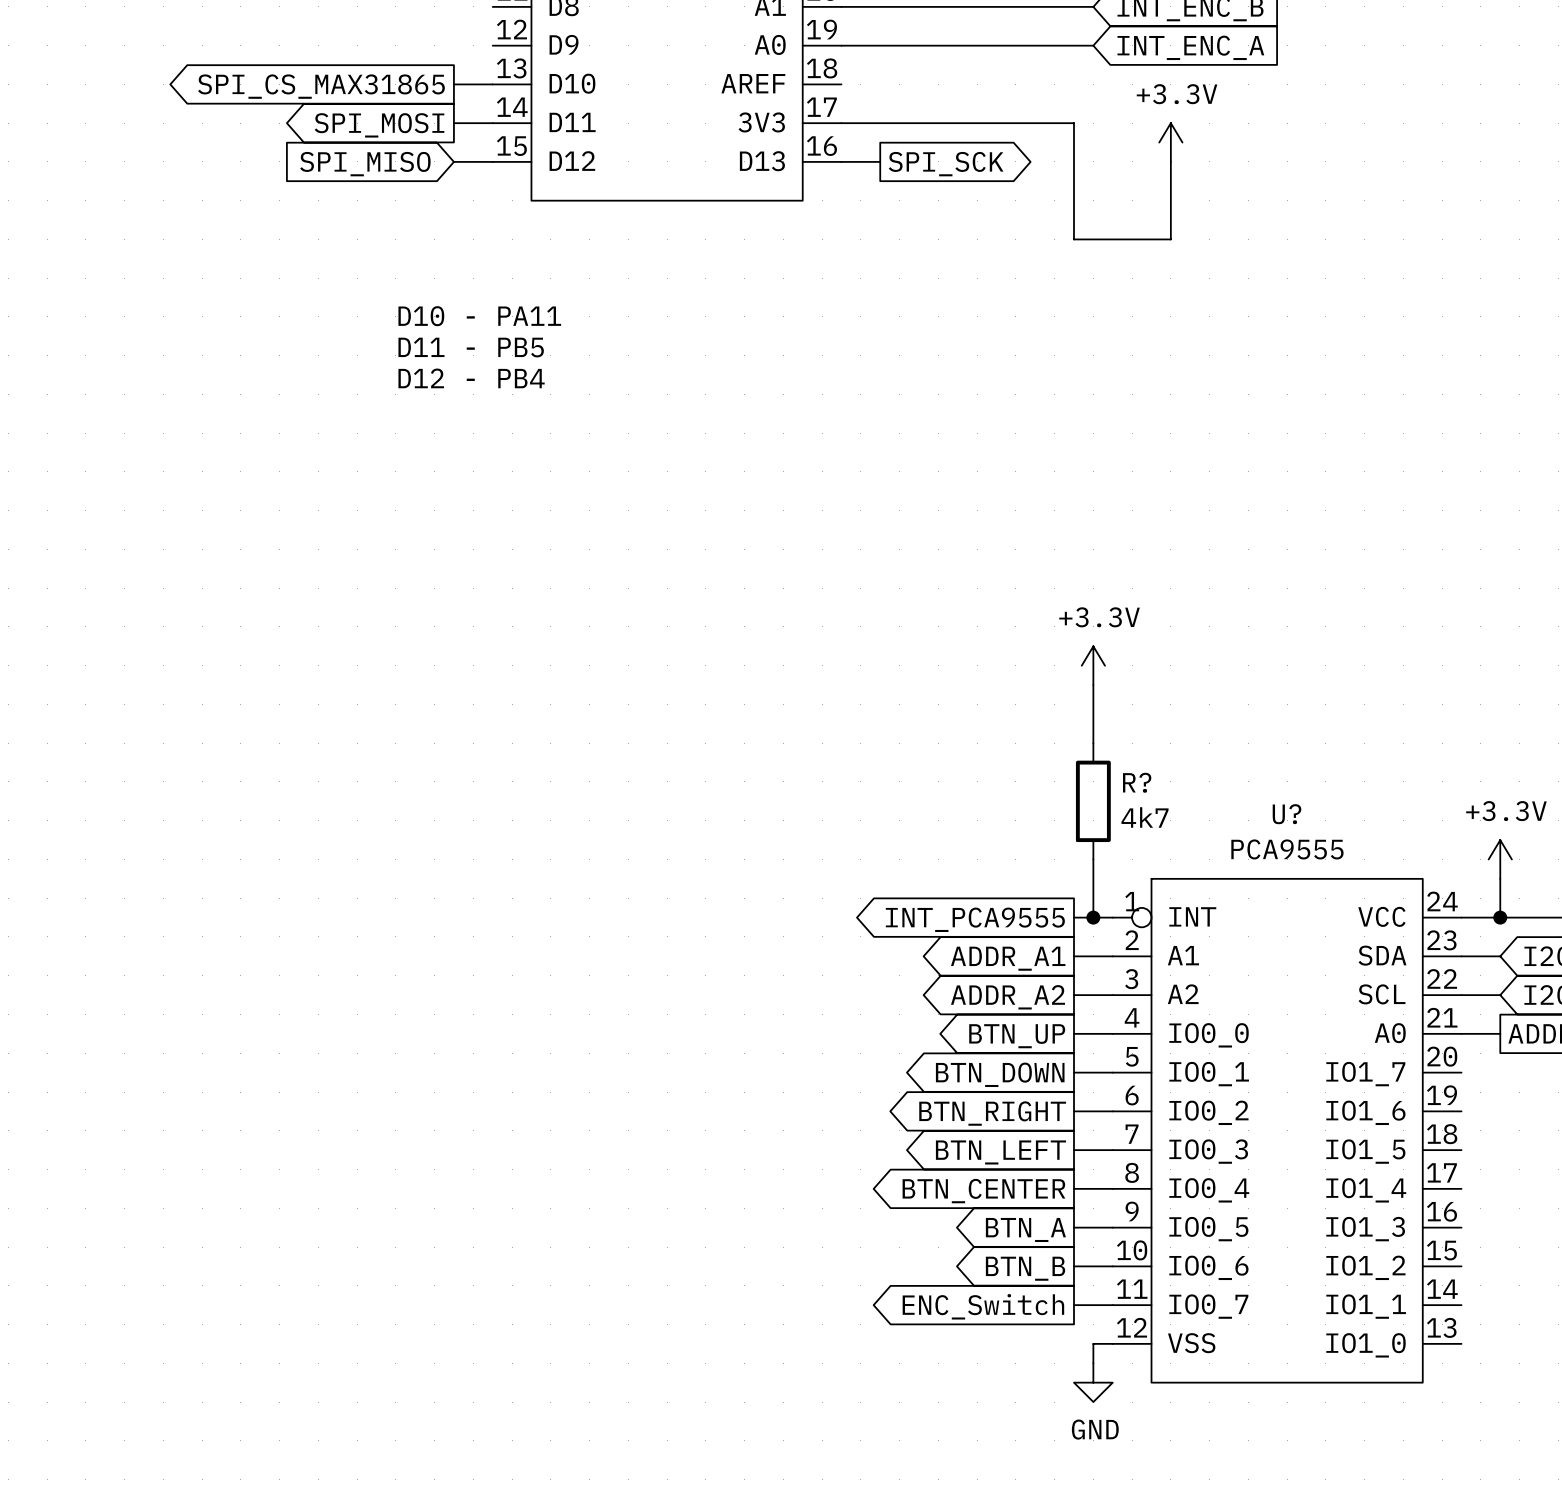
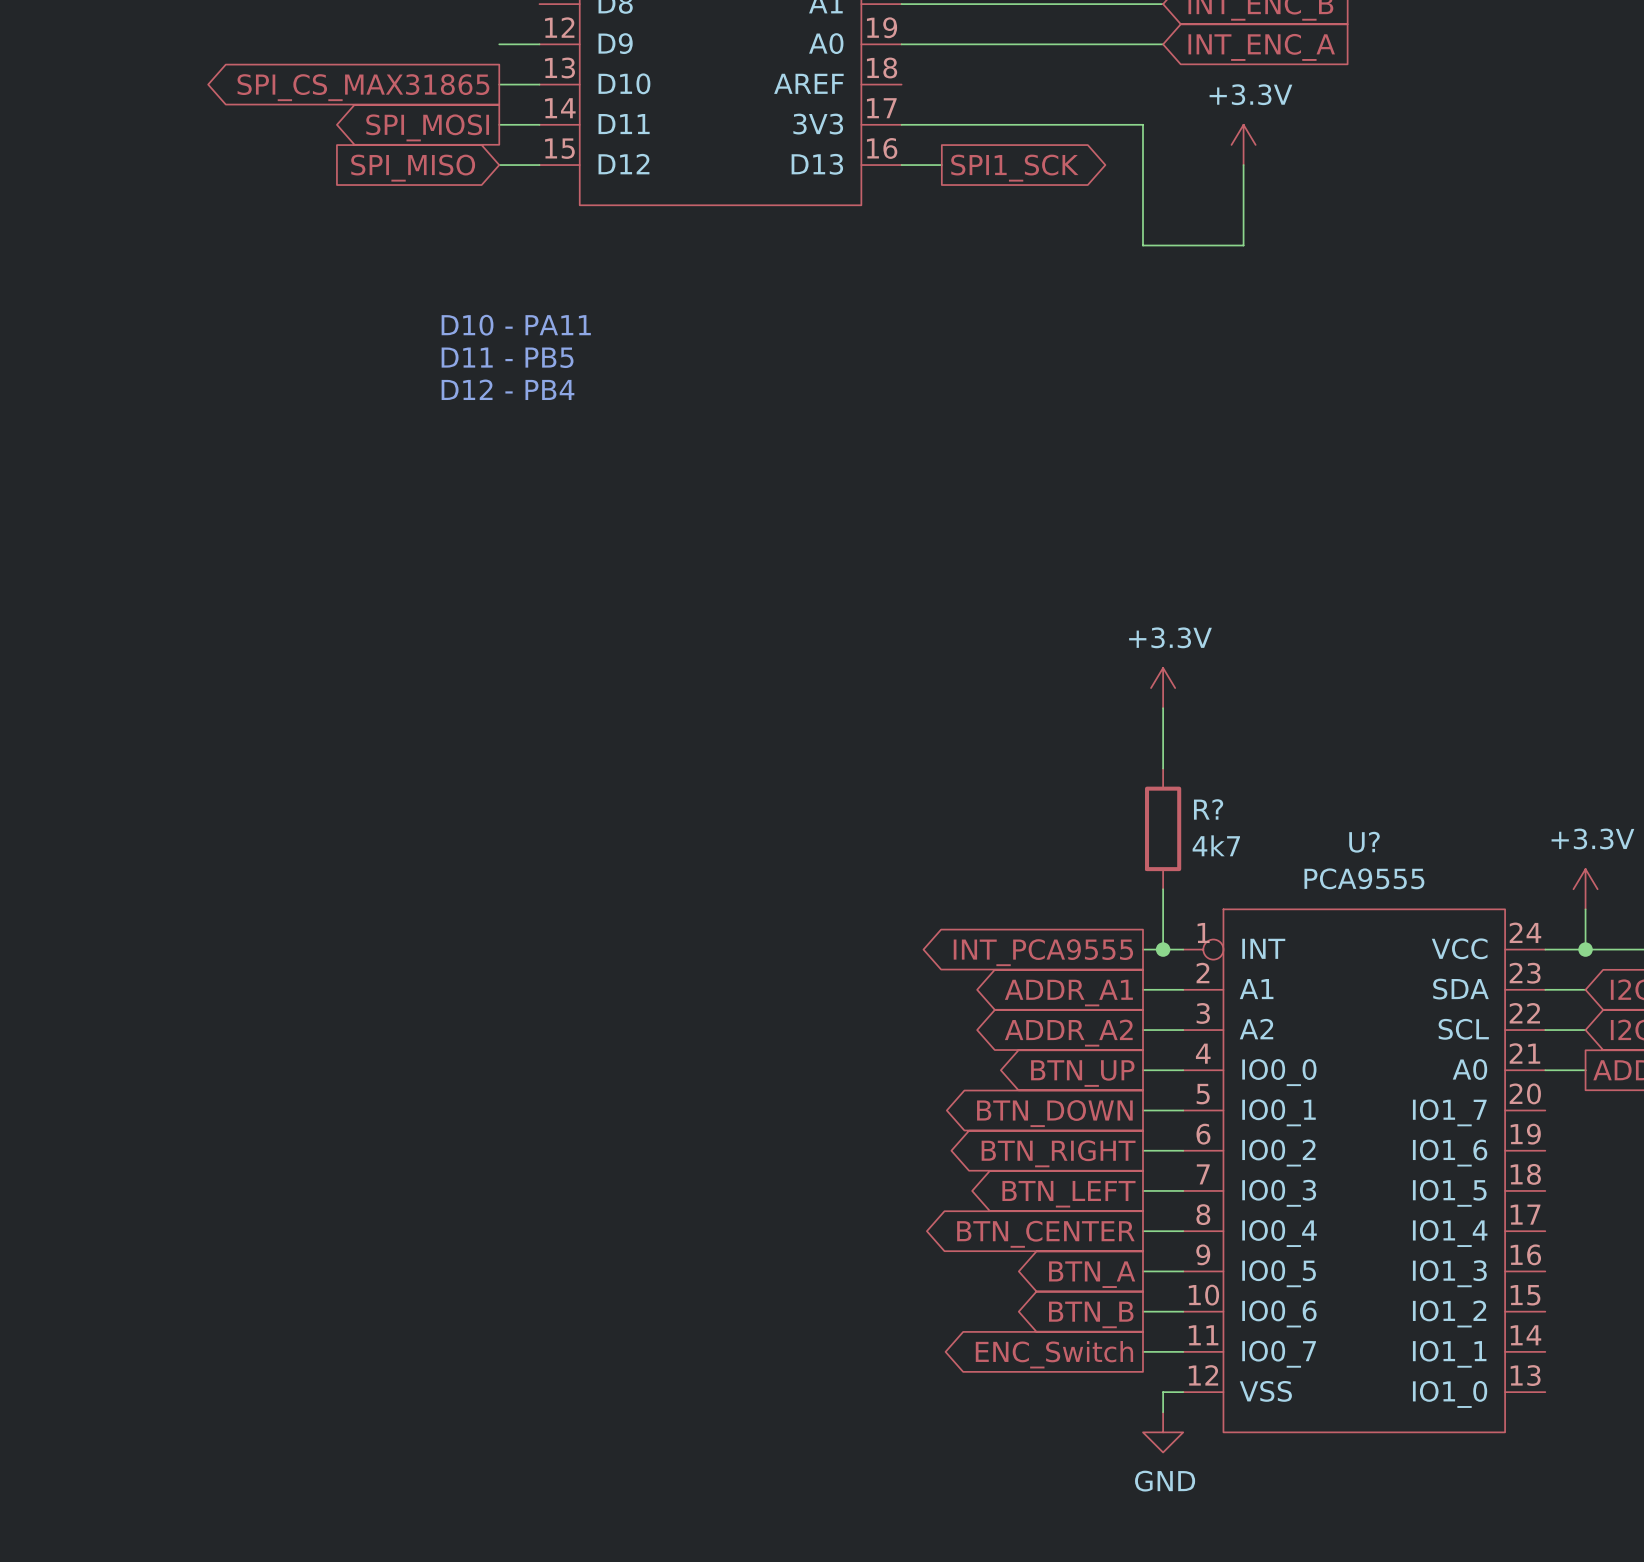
wire: none -> (499, 44) (539, 44)
global label: SPI_SCK (946, 164) -> SPI1_SCK (1014, 168)

